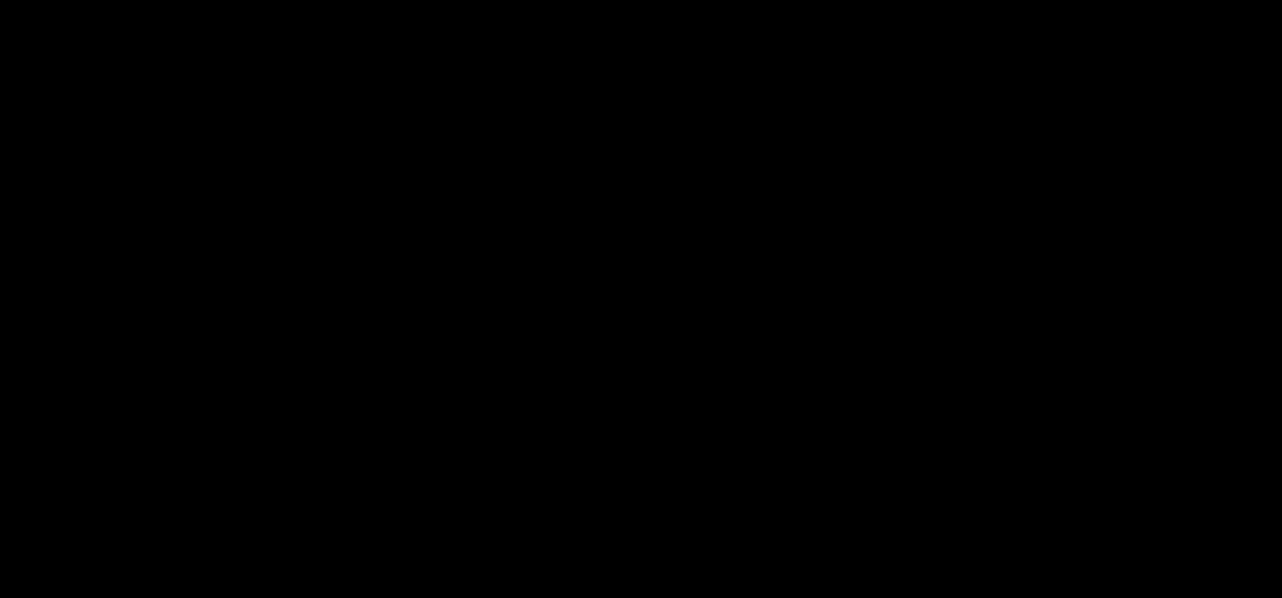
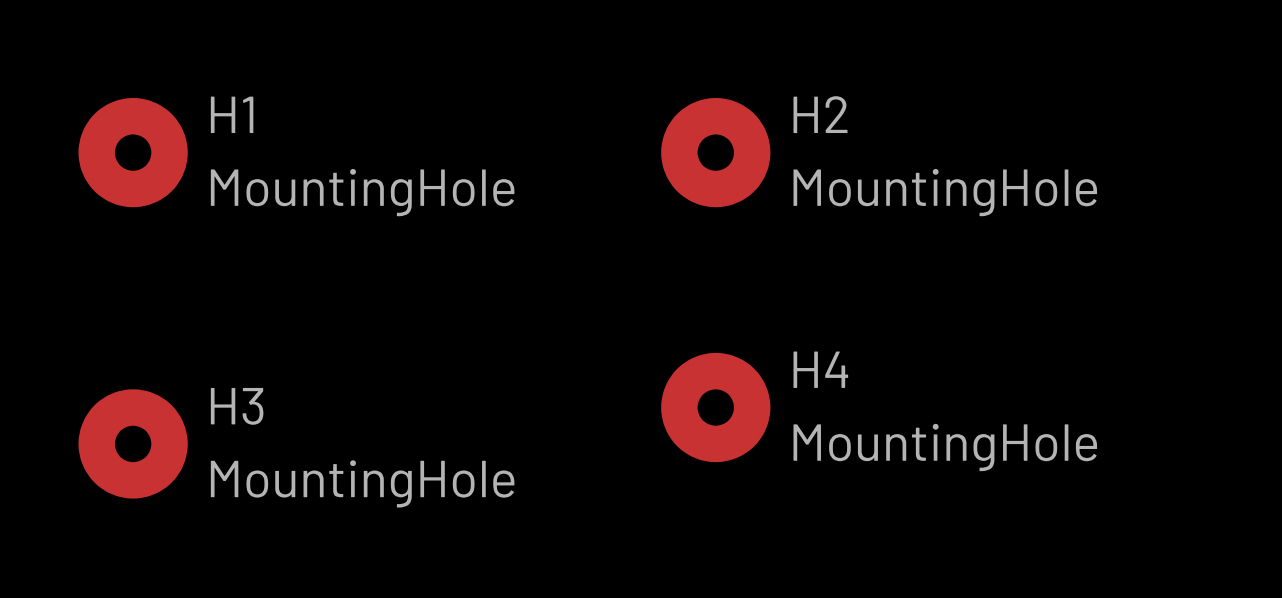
H1: none -> MountingHole (133, 152)
H2: none -> MountingHole (715, 152)
H4: none -> MountingHole (715, 407)
H3: none -> MountingHole (133, 443)

